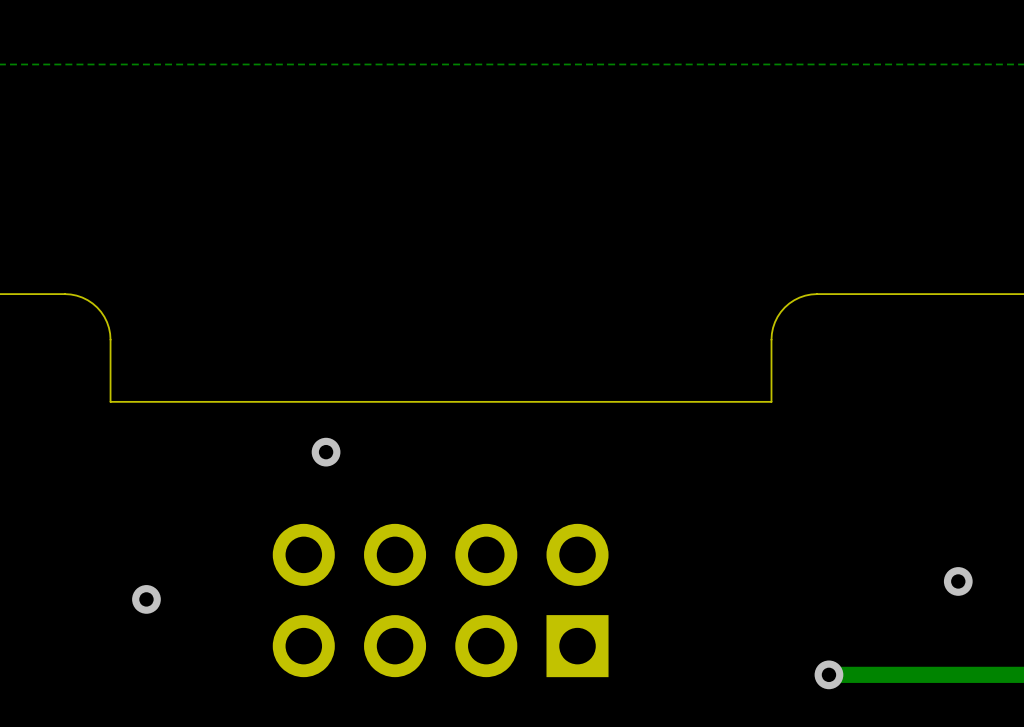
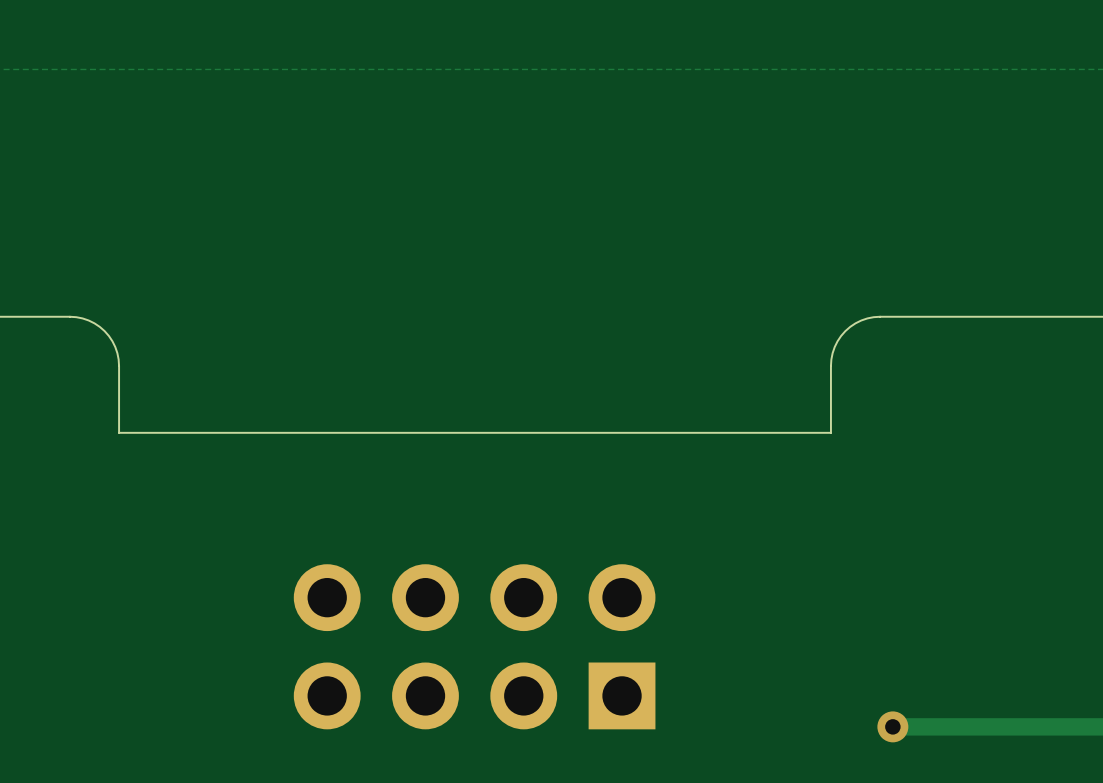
via: (326, 452) -> none
via: (958, 581) -> none
via: (146, 599) -> none

